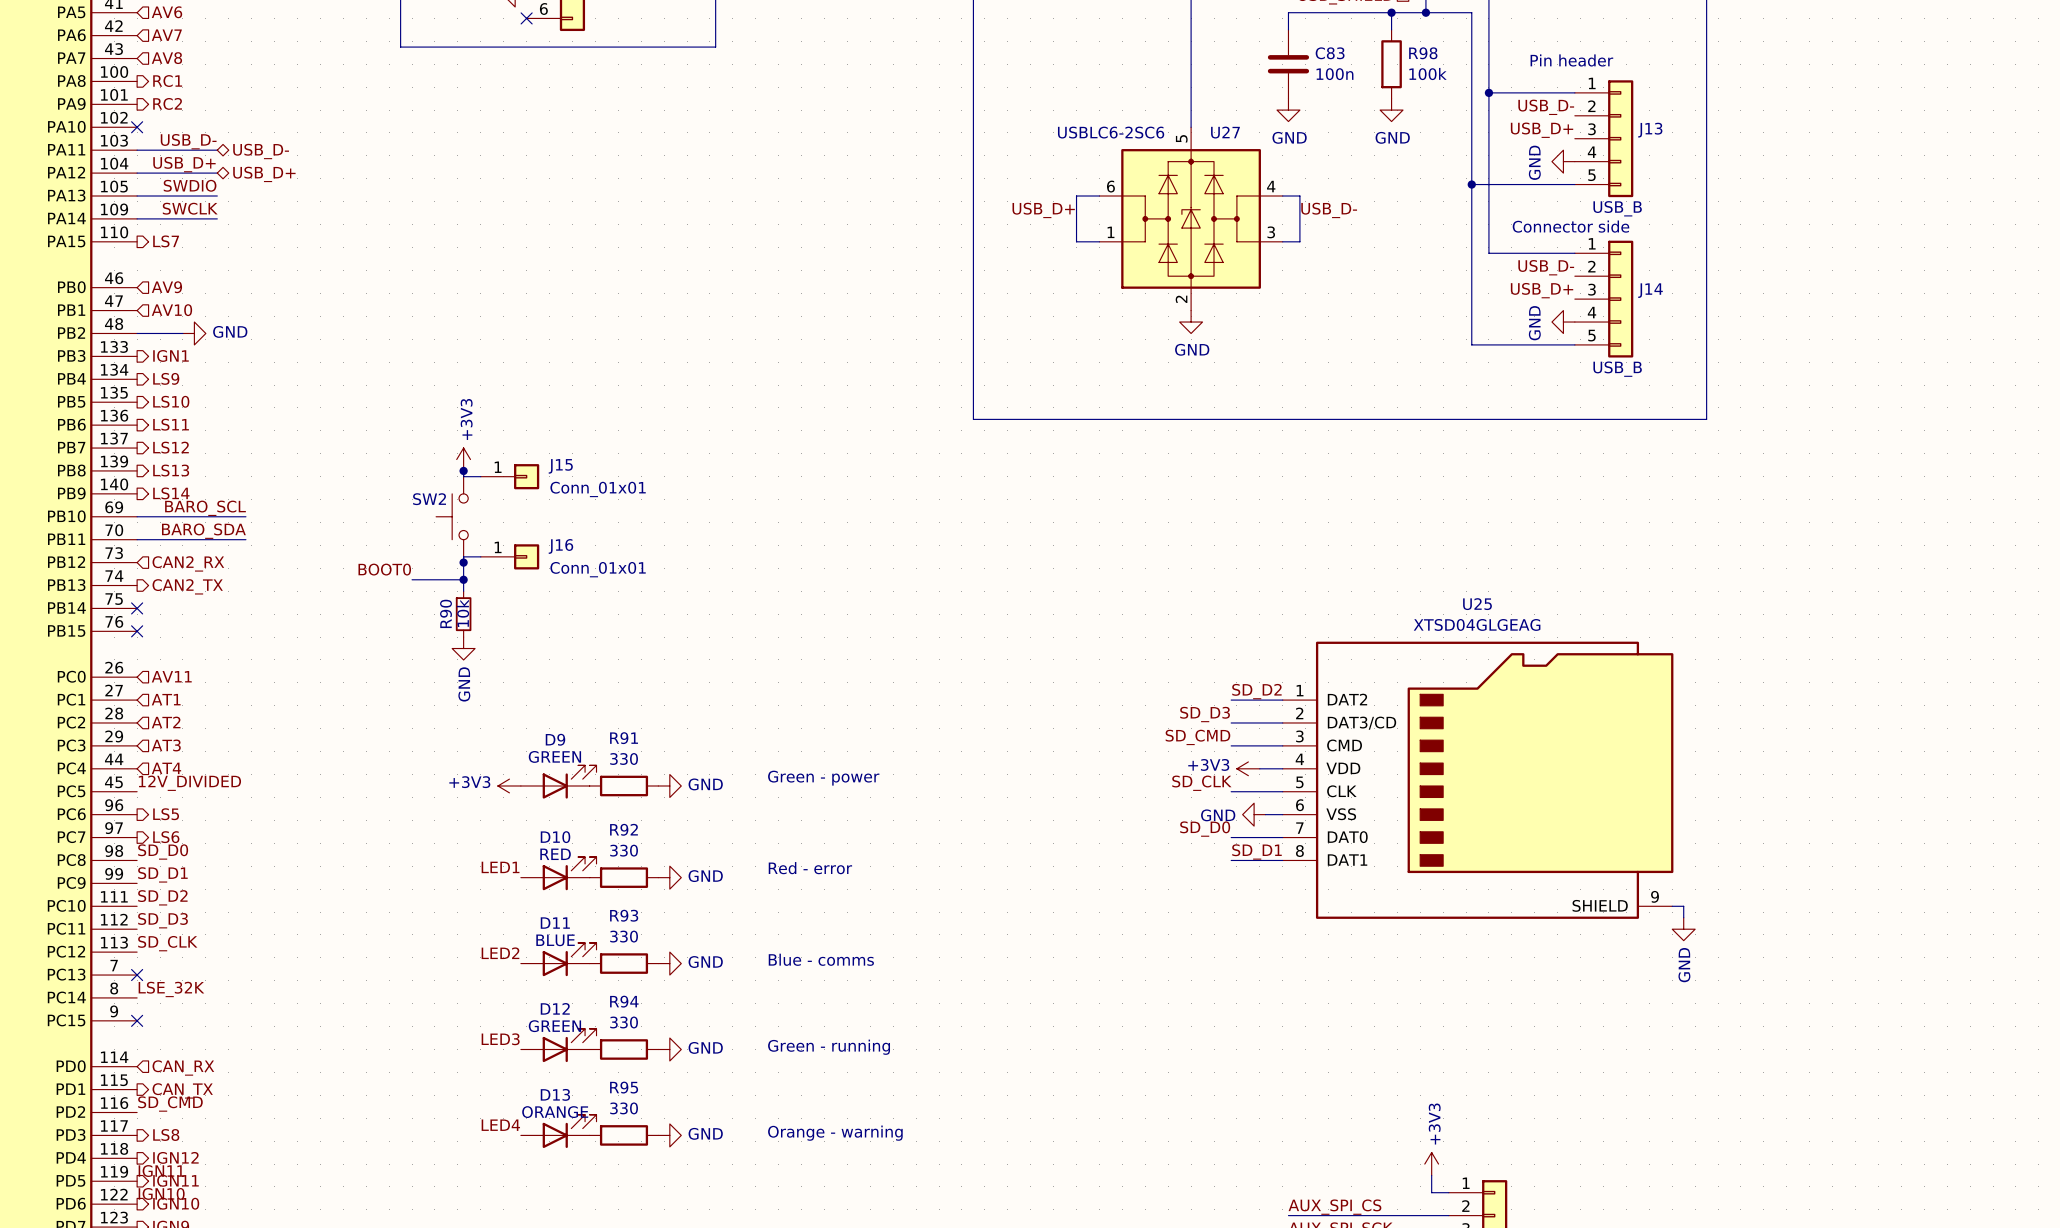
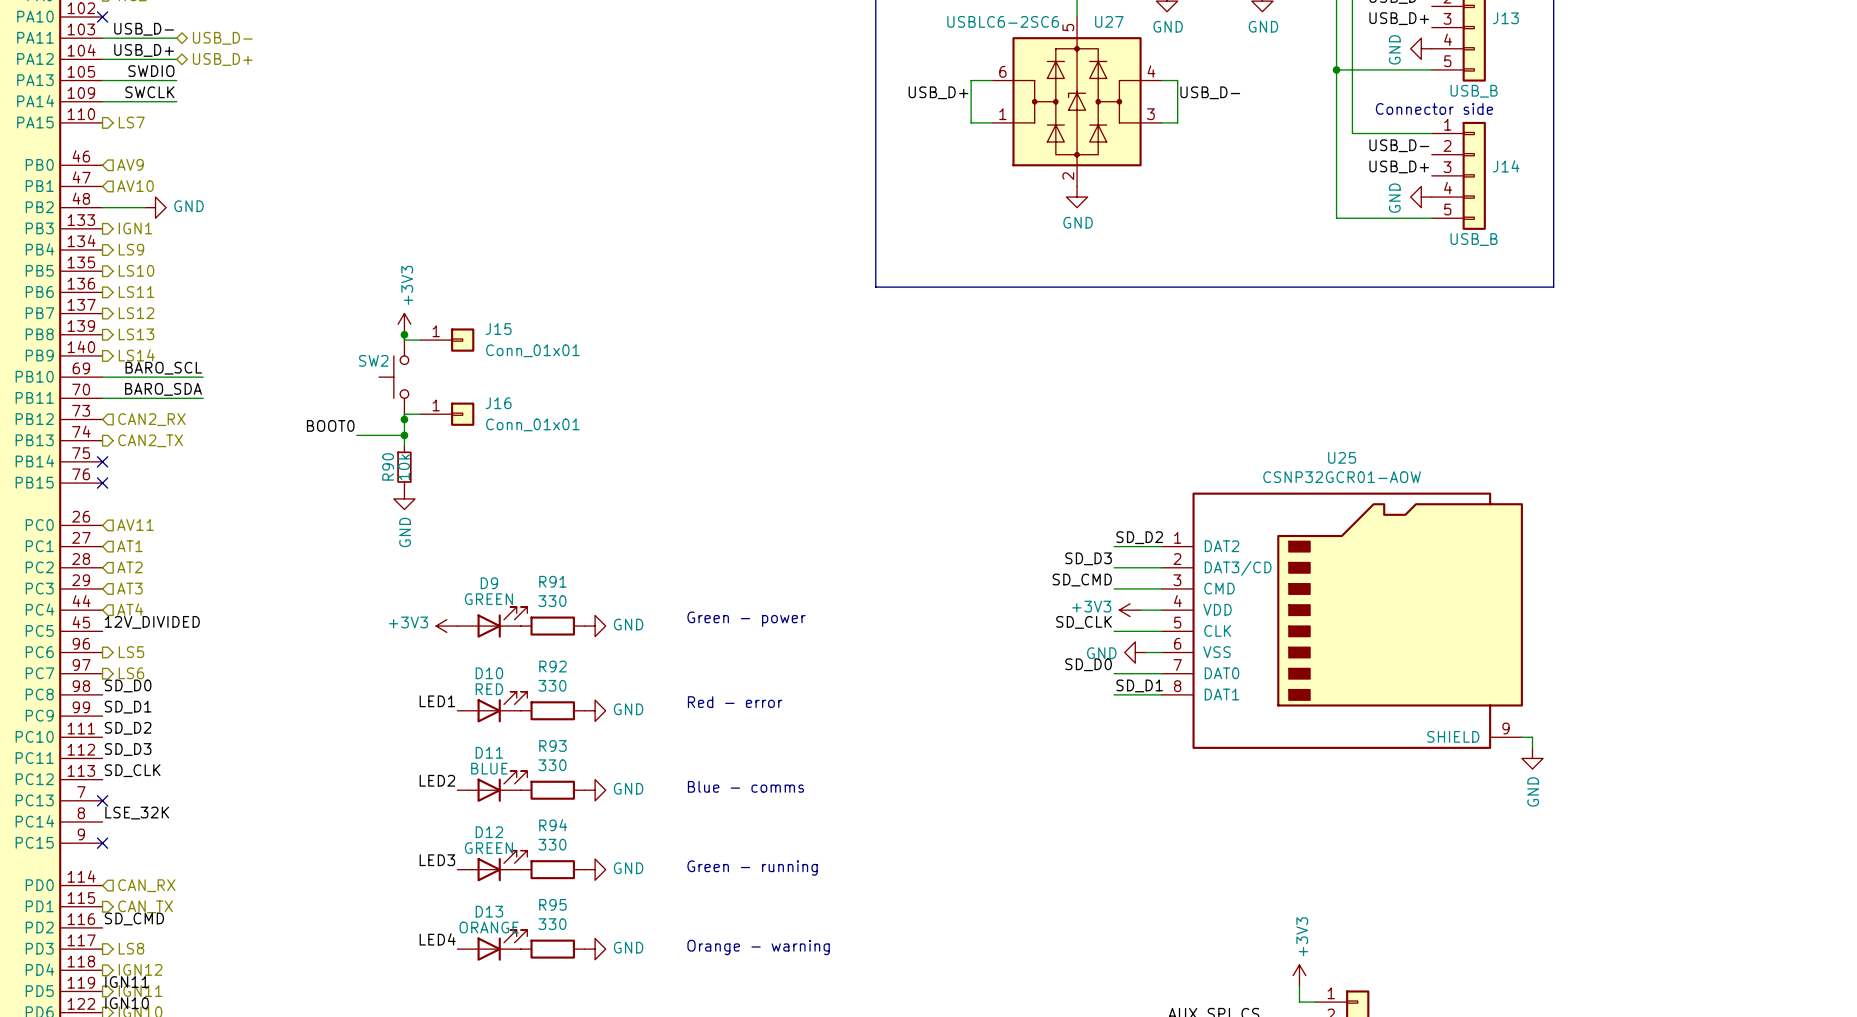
U25 value: XTSD04GLGEAG (1477, 624) -> CSNP32GCR01-AOW (1342, 477)

